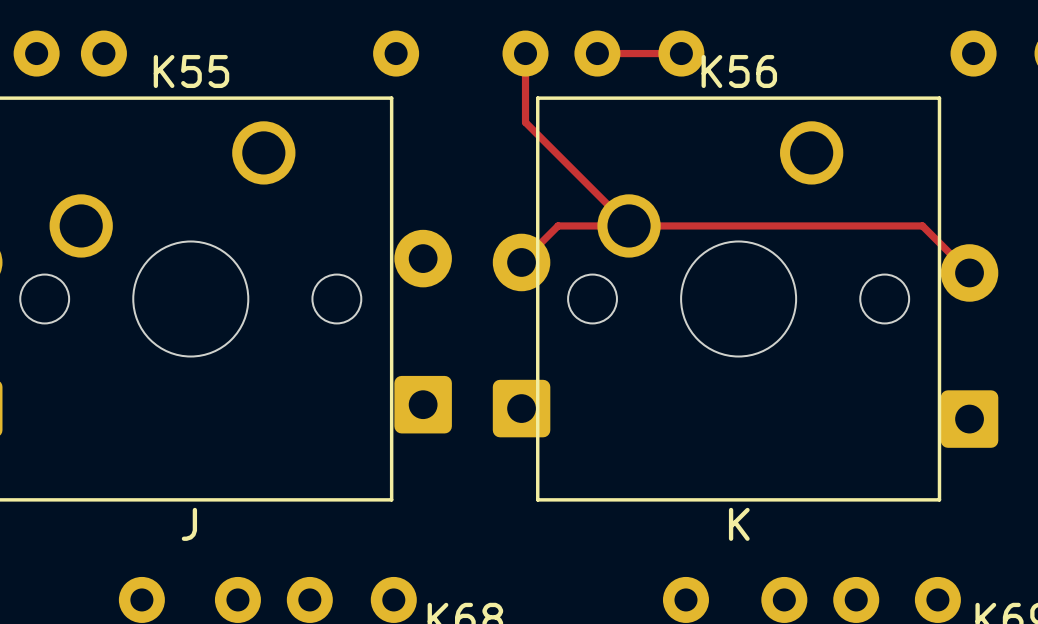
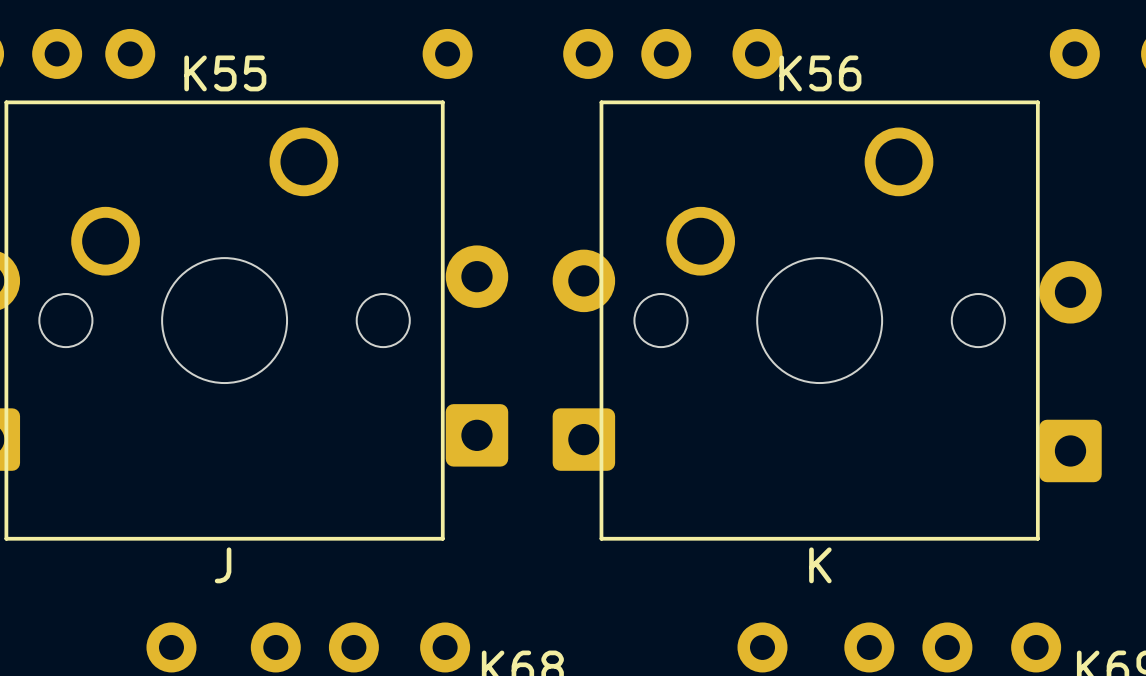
track: (525, 53) (525, 122) (629, 225) -> none
track: (597, 53) (681, 53) -> none
track: (521, 262) (558, 225) (922, 225) (969, 272) -> none

